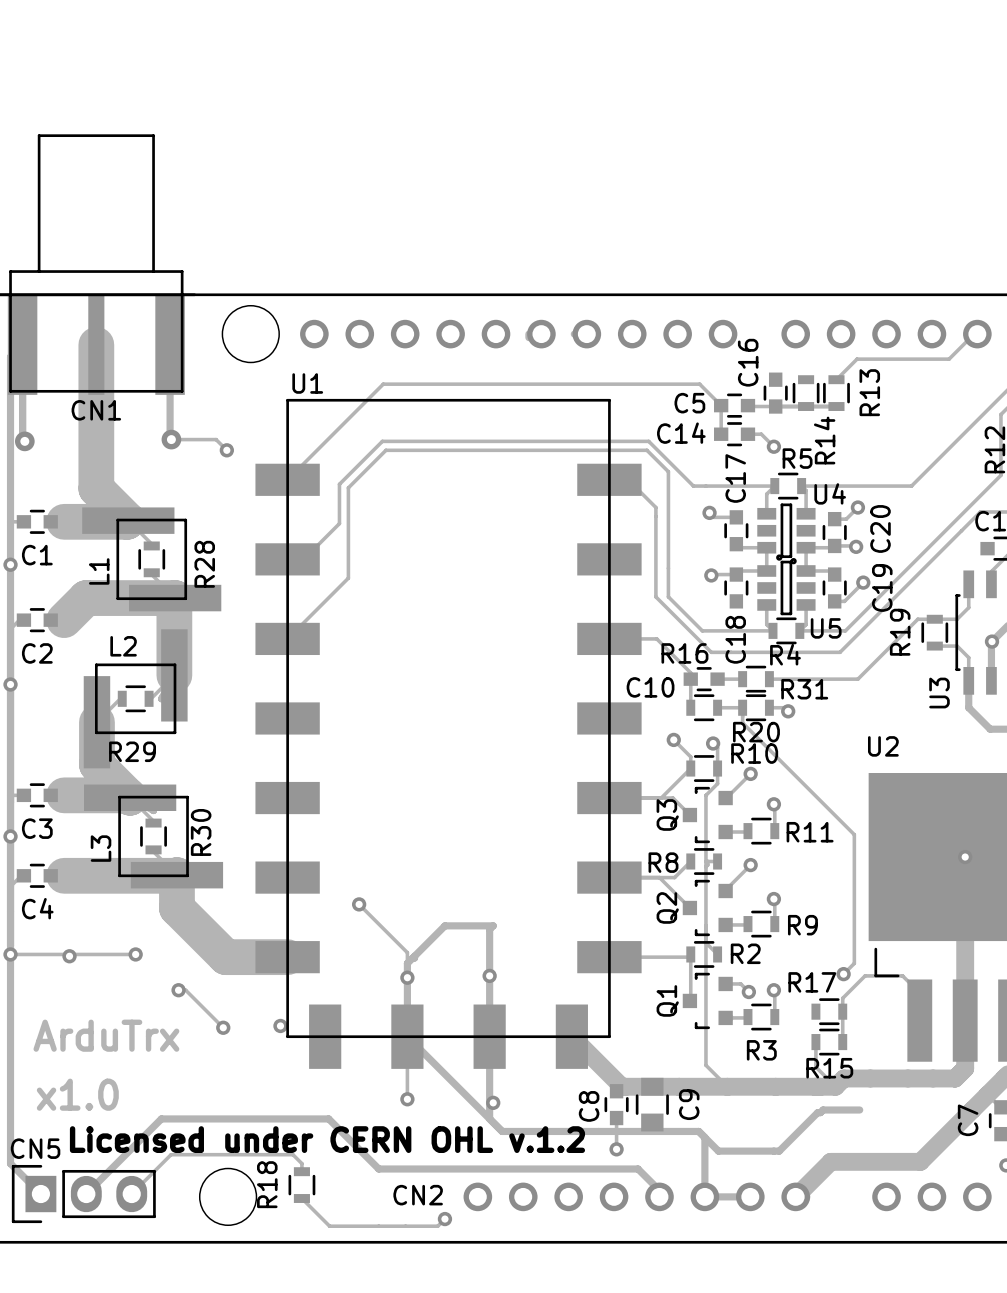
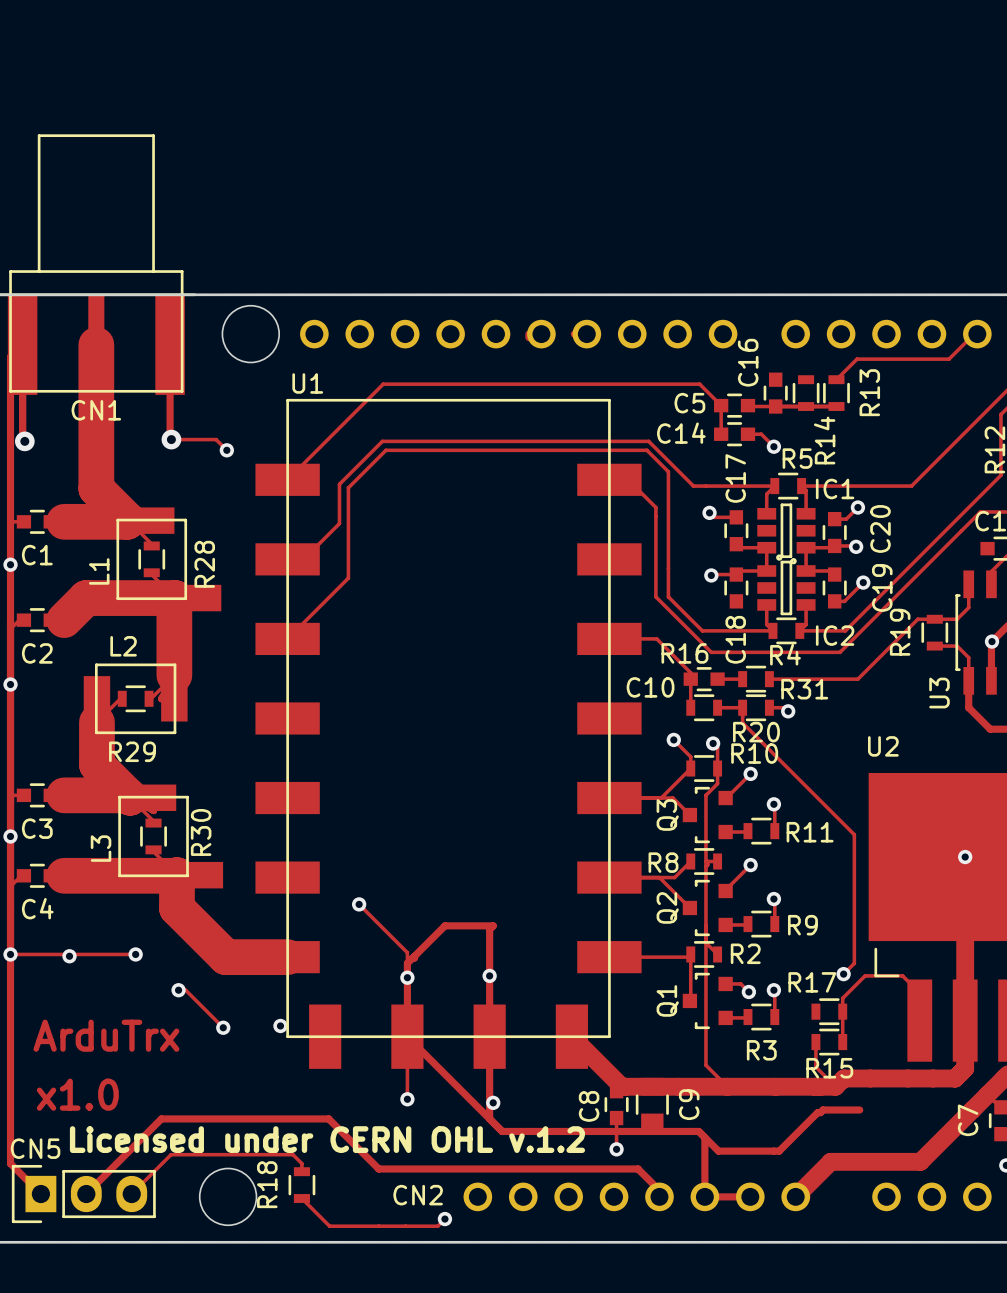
U4 name: U4 (830, 493) -> IC1 (835, 488)
U5 name: U5 (826, 628) -> IC2 (835, 635)

